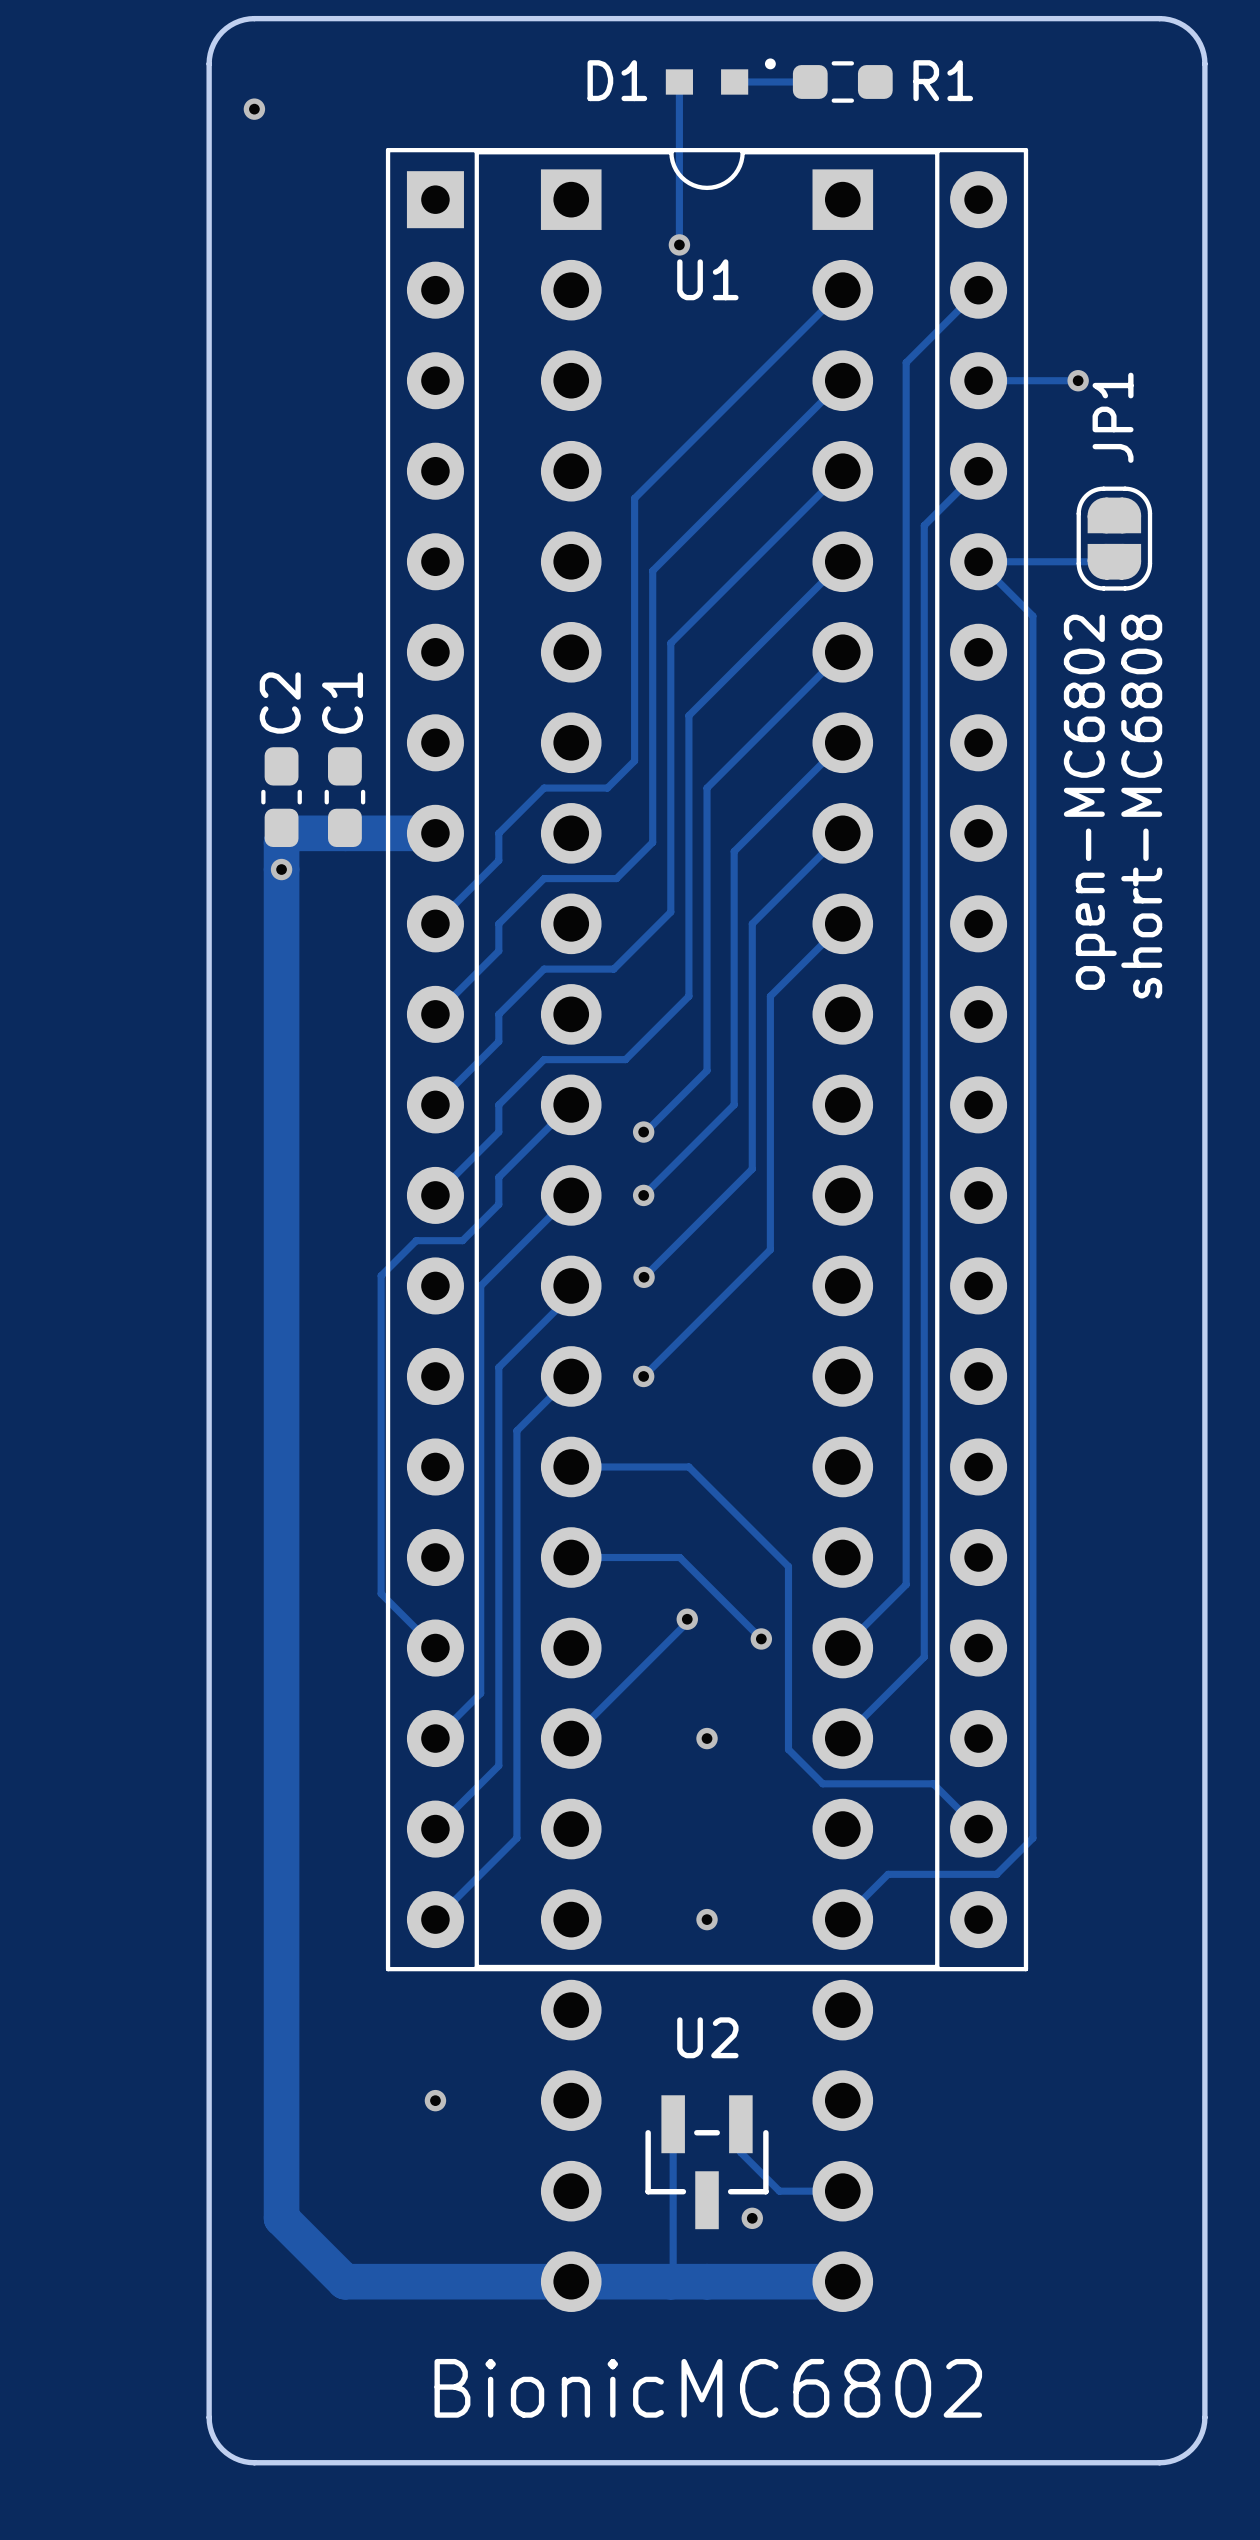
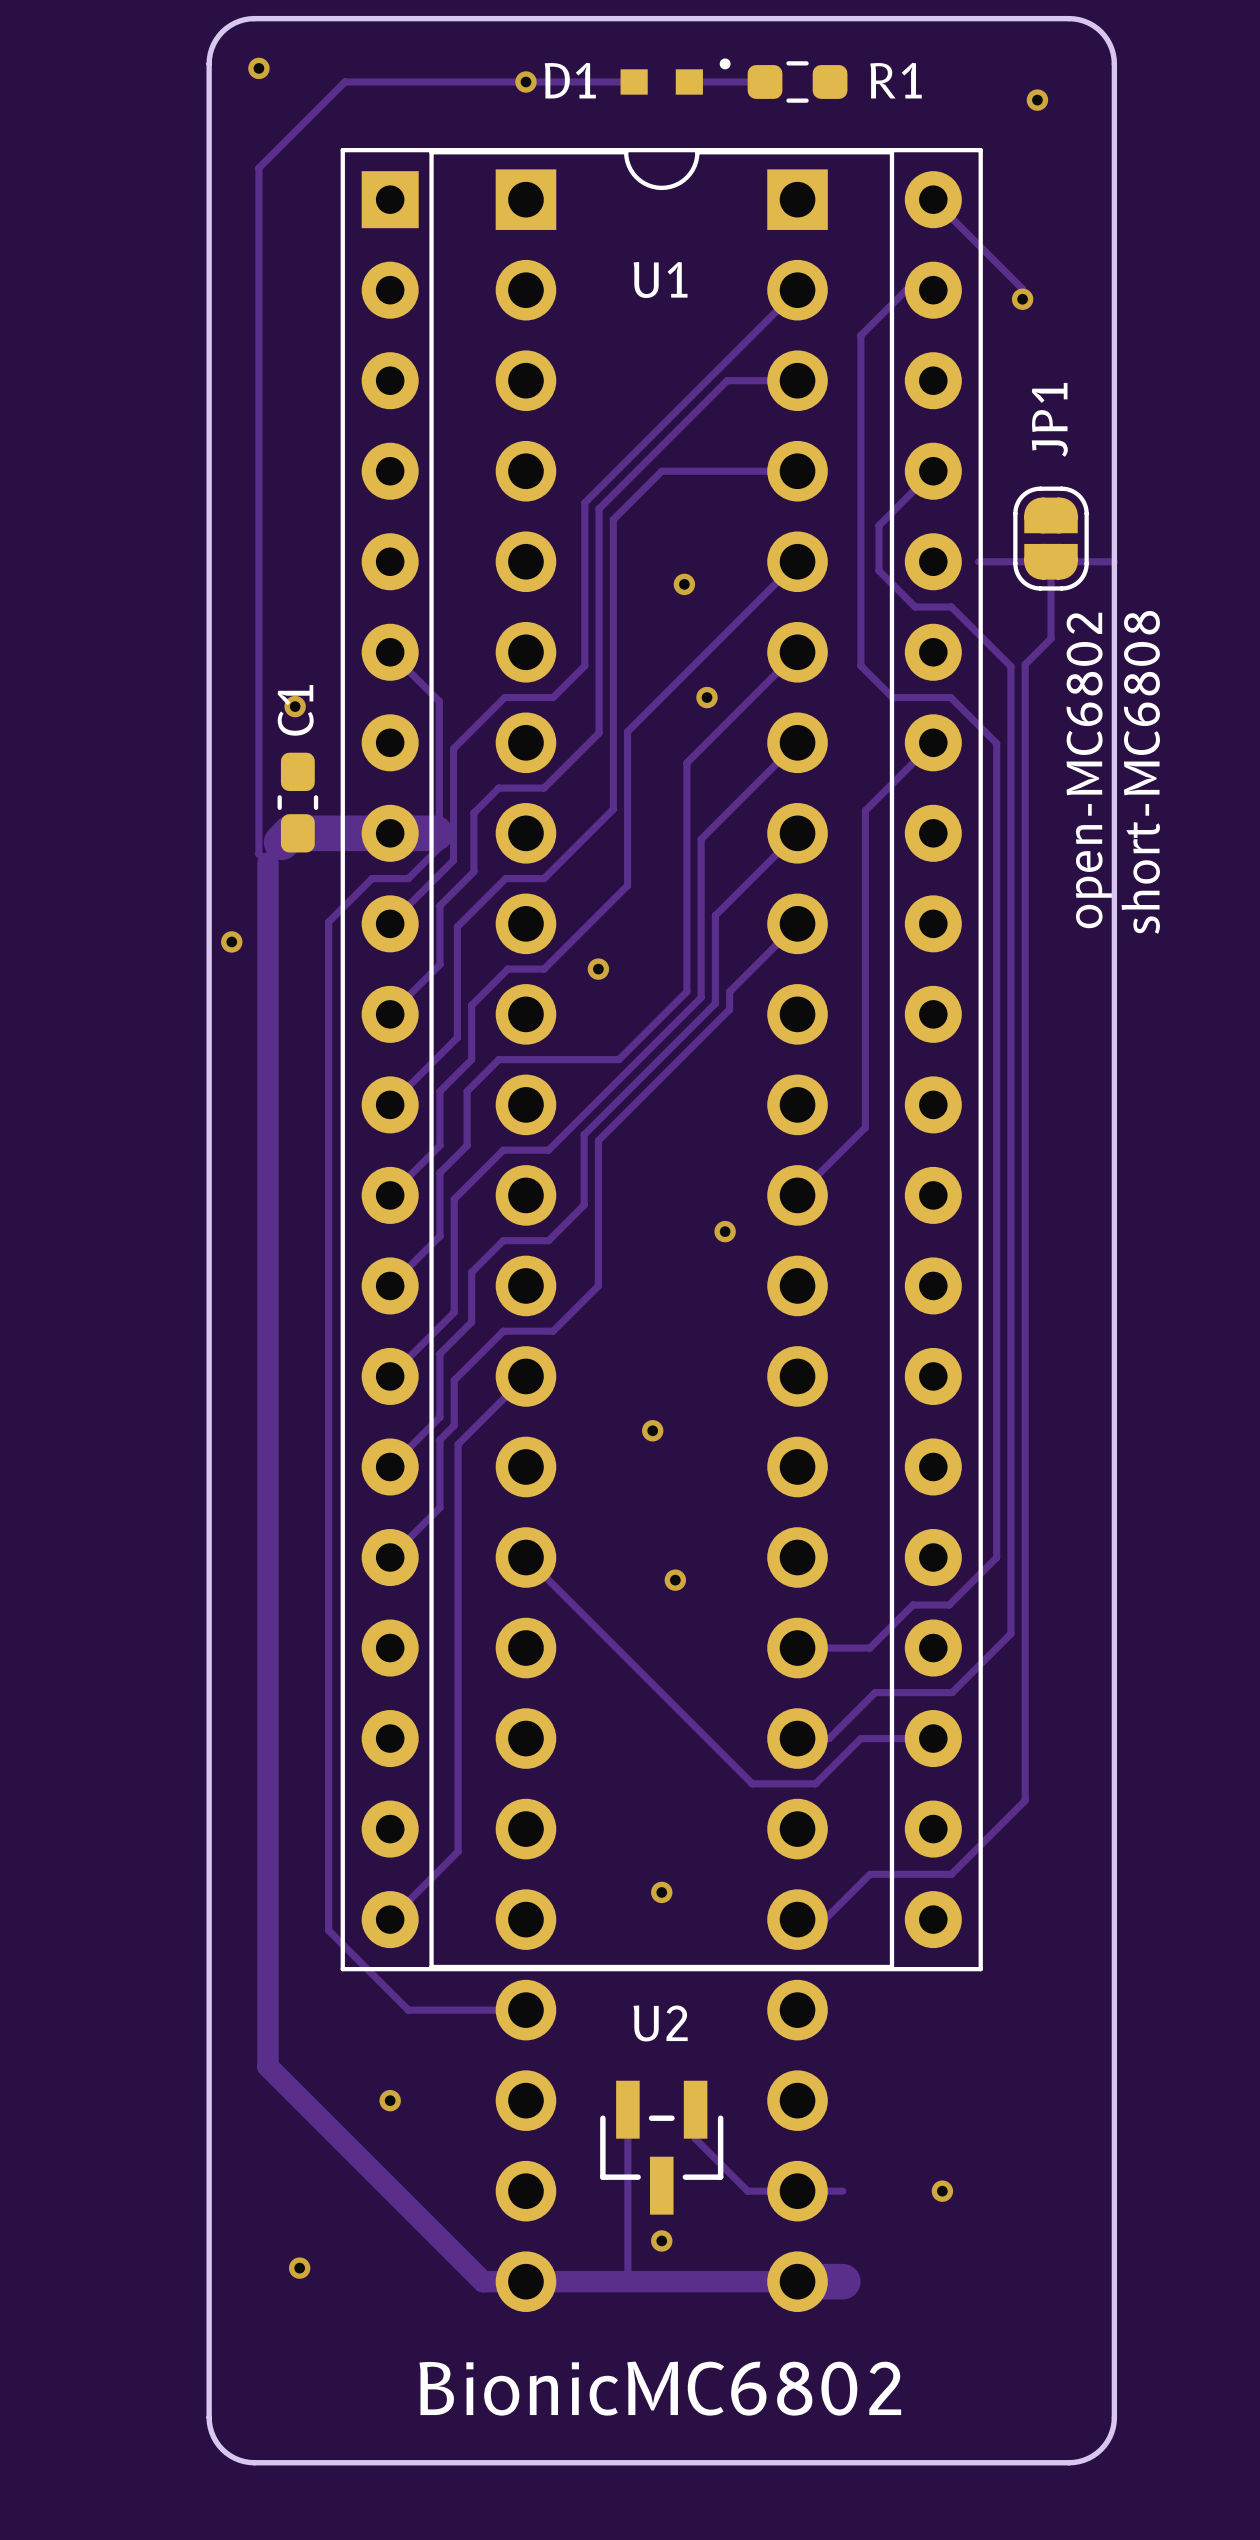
board edge: (1069, 18) (1159, 18) (1174, 21) (1187, 28) (1197, 39) (1203, 53) (1204, 63) (1204, 2422) (1200, 2437) (1195, 2445) (1187, 2452) (1174, 2460) (1159, 2462) (1069, 2462) -> (1069, 18) (1088, 23) (1101, 31) (1111, 48) (1114, 63) (1114, 2417) (1109, 2437) (1101, 2449) (1084, 2460) (1069, 2462)
D1 position: (720, 76) -> (675, 76)
via: none -> (525, 81)
track: (679, 81) (679, 244) -> none
track: (765, 81) (810, 81) -> (689, 81) (734, 81)
R1 position: (842, 81) -> (797, 81)
via: none -> (1037, 100)
via position: (254, 109) -> (258, 68)
track: none -> (933, 199) (1022, 288) (1022, 299)
via: (679, 244) -> none
track: none -> (797, 290) (584, 502) (584, 665) (553, 697) (504, 697) (453, 748) (453, 860) (390, 923)
track: (842, 290) (661, 471) -> (797, 471) (661, 471)
track: none -> (933, 290) (906, 290) (860, 335) (860, 665) (892, 697) (950, 697) (996, 743) (996, 1557) (949, 1605) (912, 1605) (869, 1648) (797, 1648)
track: (978, 290) (906, 362) (906, 1584) (842, 1648) -> none
track: none -> (797, 380) (727, 380) (599, 508) (599, 733) (544, 788) (498, 788) (473, 812) (473, 871) (439, 905) (439, 964) (390, 1014)
track: (842, 380) (652, 570) (652, 842) (616, 878) (544, 878) (498, 923) (498, 951) (435, 1014) -> none
track: (978, 380) (1078, 380) -> none
via position: (1078, 380) -> (1022, 299)
track: (842, 471) (670, 643) (670, 912) (613, 969) (544, 969) (498, 1014) (498, 1041) (435, 1104) -> none
track: none -> (933, 471) (879, 525) (879, 570) (915, 607) (951, 607) (1010, 666) (1010, 1633) (952, 1692) (875, 1692) (829, 1738) (797, 1738)
track: (978, 471) (924, 525) (924, 1657) (842, 1738) -> none
track: (634, 498) (634, 760) (607, 788) (544, 788) (498, 833) (498, 860) (435, 923) -> (634, 498) (613, 519) (613, 809) (544, 878) (505, 878) (457, 926) (457, 1037) (390, 1104)
JP1 position: (1114, 538) -> (1051, 538)
track: none -> (797, 561) (627, 731) (627, 885) (544, 969) (507, 969) (471, 1005) (471, 1059) (439, 1091) (439, 1145) (390, 1195)
track: (842, 561) (688, 715) (688, 996) (625, 1059) (618, 1059) -> (797, 652) (686, 762) (686, 991) (618, 1059)
track: (978, 561) (1032, 616) (1032, 1838) (996, 1874) (951, 1874) -> (1051, 561) (1051, 638) (1025, 664) (1025, 1800) (951, 1874)
via: none -> (684, 584)
track: none -> (390, 652) (439, 701) (439, 847) (408, 878) (372, 878) (328, 922) (328, 1930) (408, 2010) (525, 2010)
track: (842, 652) (707, 788) (707, 1070) (643, 1132) -> none
via: none -> (707, 697)
via: none -> (295, 706)
track: none -> (797, 742) (701, 839) (701, 997) (548, 1150) (503, 1150) (454, 1199) (454, 1312) (390, 1376)
track: (842, 742) (734, 851) (734, 1104) (643, 1195) -> none
track: none -> (933, 742) (865, 810) (865, 1127) (797, 1195)
C2: (281, 797) -> none
C1 position: (344, 797) -> (297, 802)
track: (281, 827) (281, 2218) (344, 2281) (483, 2281) -> (634, 81) (344, 81) (258, 167) (258, 854) (267, 863) (267, 2066) (483, 2281)
track: none -> (797, 833) (715, 915) (715, 1003) (584, 1134) (584, 1205) (548, 1240) (503, 1240) (471, 1272) (471, 1322) (439, 1353) (439, 1417) (390, 1466)
track: (842, 833) (752, 923) (752, 1169) (644, 1277) -> none
via: (281, 869) -> none
track: none -> (797, 923) (729, 991) (729, 1009) (598, 1140) (598, 1285) (553, 1331) (503, 1331) (454, 1380) (454, 1425) (439, 1439) (439, 1507) (390, 1557)
track: (842, 923) (770, 996) (770, 1249) (643, 1376) -> none
via: none -> (231, 941)
via: none -> (598, 969)
track: (544, 1059) (498, 1104) (498, 1132) (435, 1195) -> (544, 1059) (498, 1059) (467, 1091) (467, 1145) (439, 1172) (439, 1236) (390, 1285)
U1 position: (707, 1059) -> (661, 1059)
track: (571, 1104) (498, 1177) (498, 1204) (462, 1240) (416, 1240) (381, 1275) (381, 1593) (435, 1648) -> none
via: (643, 1132) -> none
track: (571, 1195) (480, 1285) (480, 1693) (435, 1738) -> none
via: (643, 1195) -> none
via: none -> (725, 1231)
part position: (571, 1240) -> (525, 1240)
part position: (842, 1240) -> (797, 1240)
via: (644, 1277) -> none
track: (571, 1285) (571, 1294) (498, 1367) (498, 1765) (435, 1829) -> none
track: none -> (525, 1376) (458, 1444) (458, 1851) (390, 1919)
track: (571, 1376) (516, 1430) (516, 1838) (435, 1919) -> none
via position: (643, 1376) -> (652, 1430)
track: (571, 1466) (688, 1466) (788, 1566) (788, 1749) (822, 1783) (933, 1783) (978, 1829) -> none
track: none -> (525, 1557) (752, 1783) (815, 1783) (860, 1738) (933, 1738)
track: (571, 1557) (679, 1557) (761, 1638) -> none
track: (687, 1619) (687, 1622) (571, 1738) -> none
via position: (687, 1619) -> (675, 1580)
via: (761, 1638) -> none
via: (707, 1738) -> none
track: (888, 1874) (842, 1919) -> (888, 1874) (869, 1874) (824, 1919) (797, 1919)
via position: (707, 1919) -> (661, 1892)
via position: (435, 2100) -> (390, 2100)
track: none -> (627, 2109) (627, 2279)
track: (673, 2124) (673, 2279) (670, 2281) -> none
track: (740, 2124) (740, 2152) (779, 2191) -> (695, 2124) (695, 2139) (747, 2191) (779, 2191)
U2 position: (707, 2162) -> (661, 2147)
via: none -> (942, 2191)
via position: (752, 2218) -> (661, 2240)
via: none -> (299, 2268)
track width: thick (483, 2281) (797, 2281) -> thin (483, 2281) (797, 2281)
text position: BionicMC6802 (708, 2388) -> BionicMC6802 (660, 2388)

